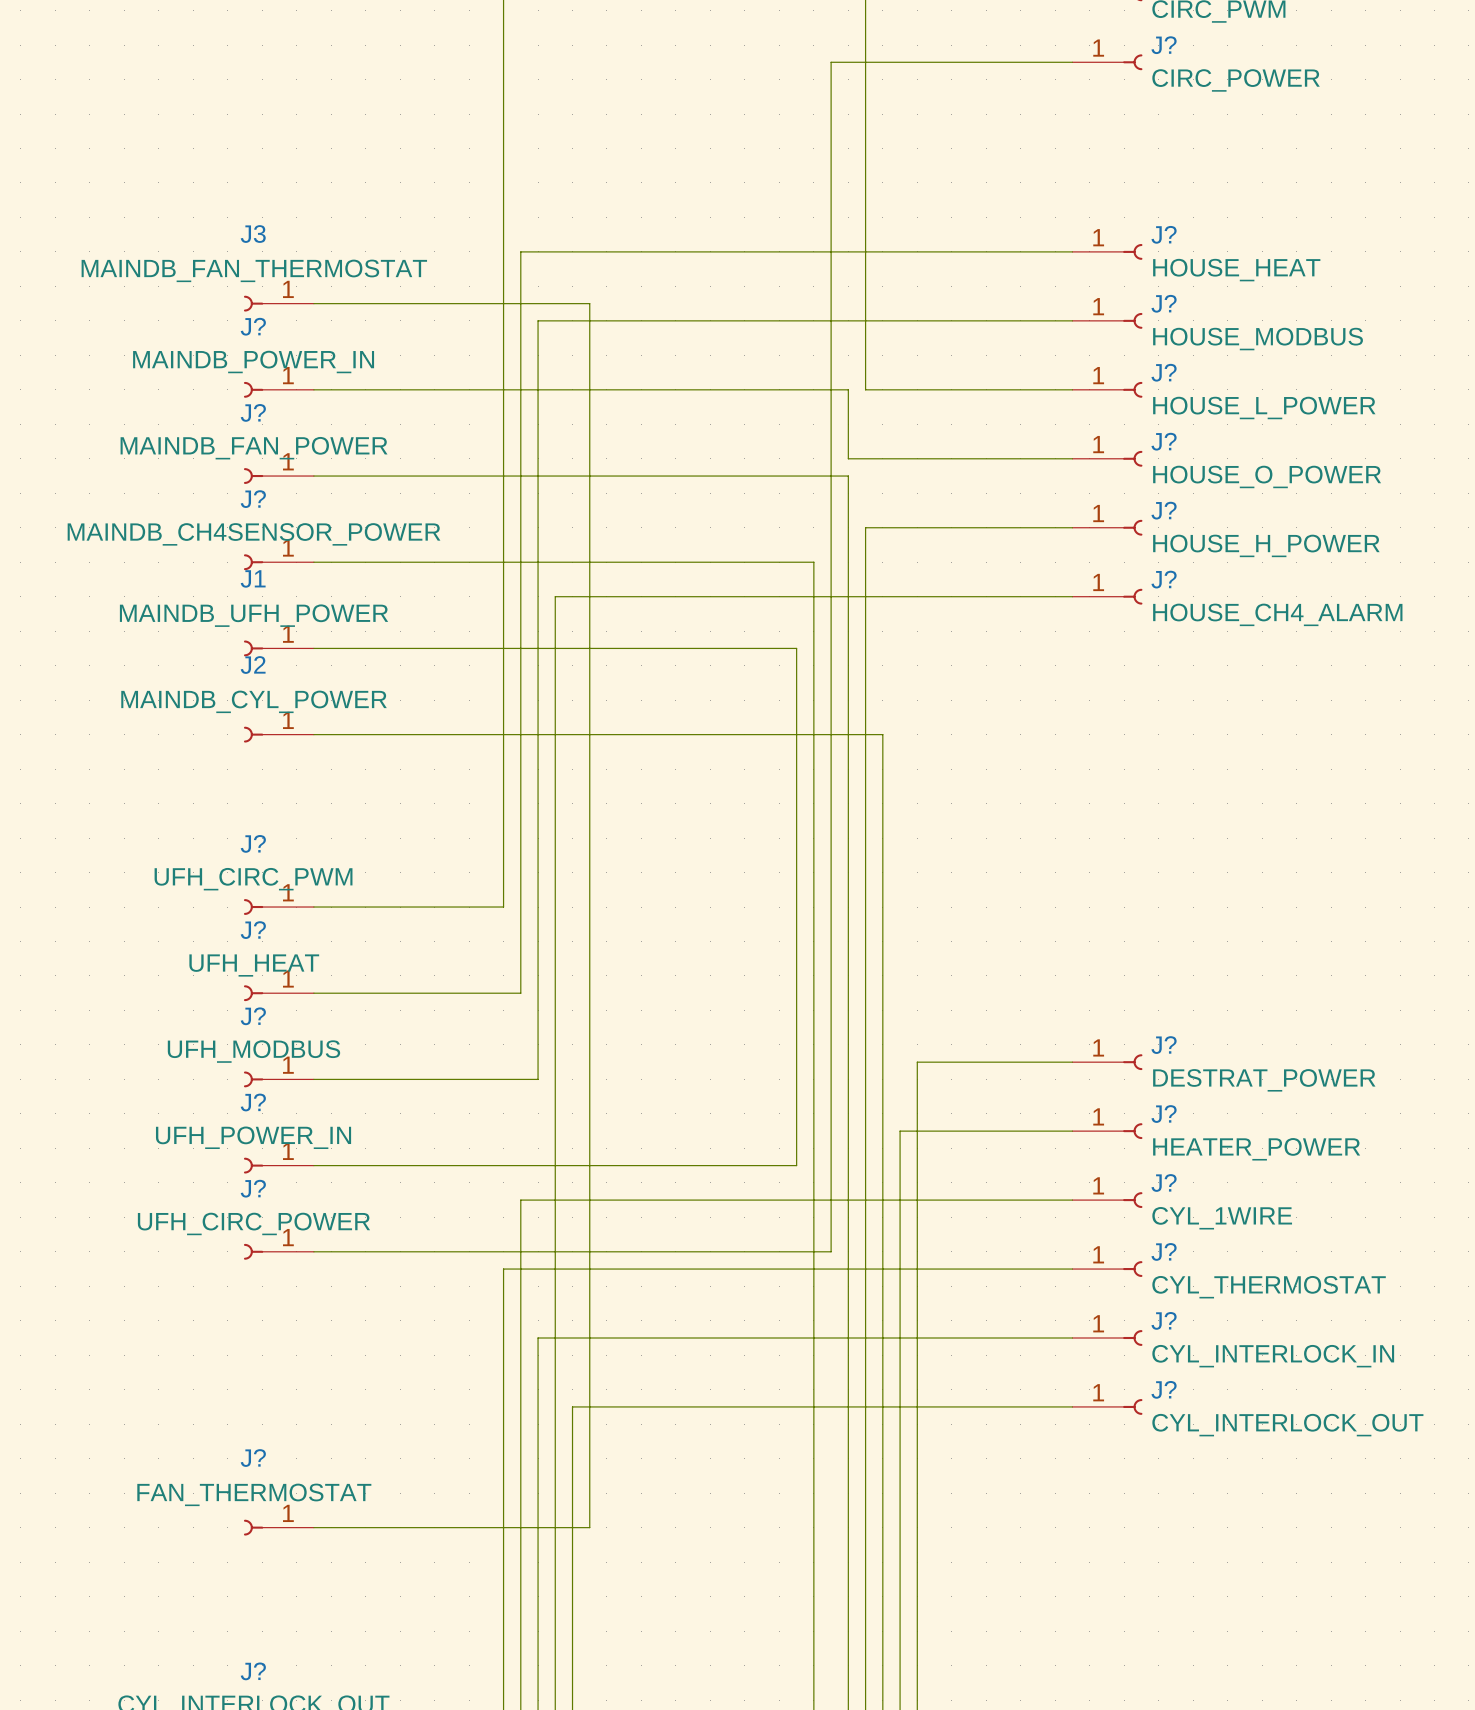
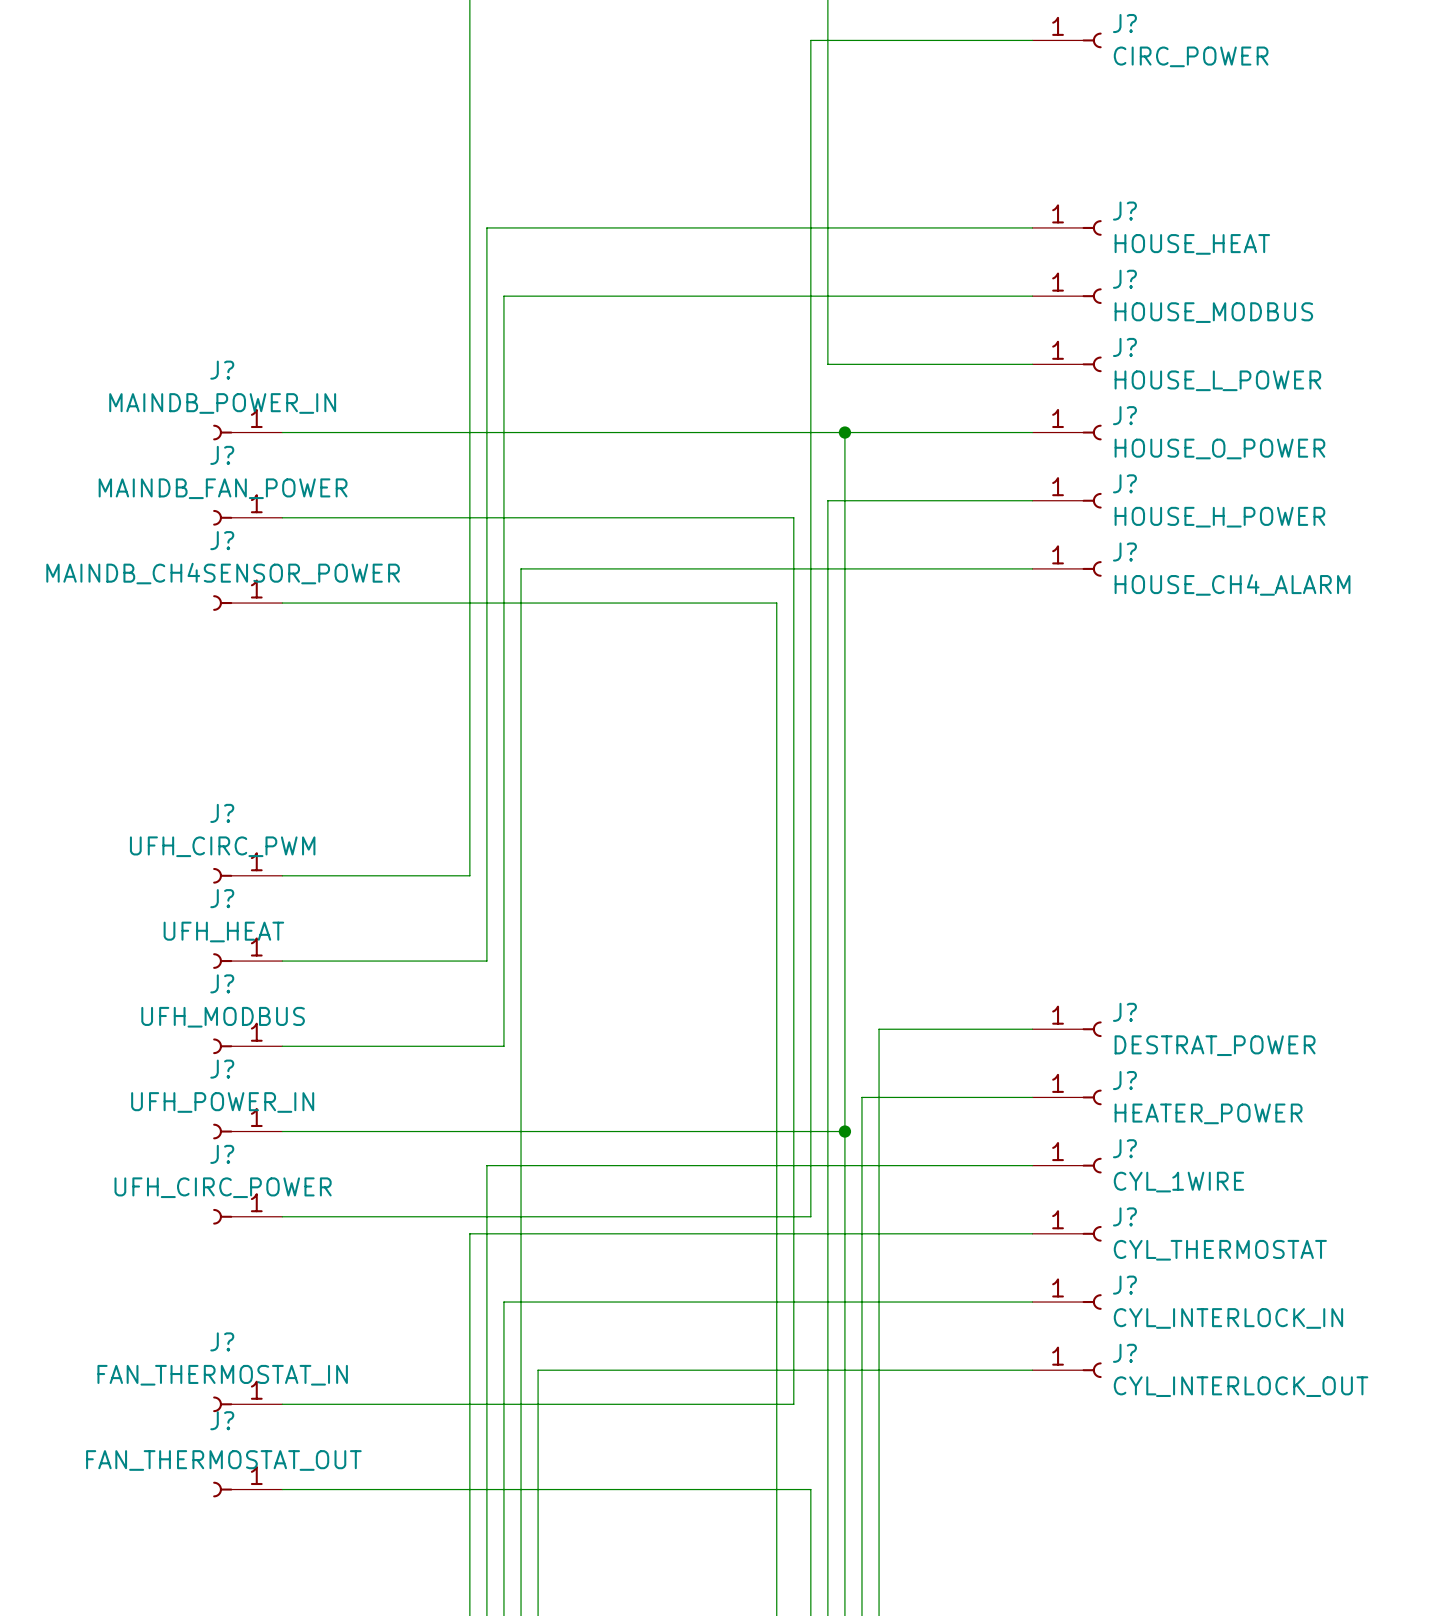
wire: (848, 62) (831, 62) (831, 544) -> (810, 40) (810, 364)
J3: MAINDB_FAN_THERMOSTAT (278, 303) -> none
wire: (313, 303) (589, 303) (589, 1527) -> none
J? position: (278, 389) -> (247, 432)
wire: (313, 389) (848, 389) -> none
junction: none -> (844, 432)
J? position: (278, 476) -> (247, 517)
wire: (313, 476) (848, 476) -> (282, 432) (810, 432) (810, 449)
wire: none -> (282, 517) (793, 517)
J? position: (278, 562) -> (247, 603)
wire: (313, 562) (813, 562) (813, 631) -> (282, 603) (776, 603)
J1: MAINDB_UFH_POWER (278, 648) -> none
wire: (313, 648) (796, 648) (796, 1165) -> (844, 1131) (759, 1131)
J2: MAINDB_CYL_POWER (278, 734) -> none
wire: (313, 734) (882, 734) -> (844, 432) (844, 705)
junction: none -> (844, 1131)
wire: (848, 1251) (848, 1527) -> (555, 1489) (810, 1489)
wire: none -> (810, 1216) (793, 1216) (793, 1404) (282, 1404)
J?: none -> FAN_THERMOSTAT_IN (247, 1404)
J? value: FAN_THERMOSTAT (254, 1494) -> FAN_THERMOSTAT_OUT (223, 1460)

